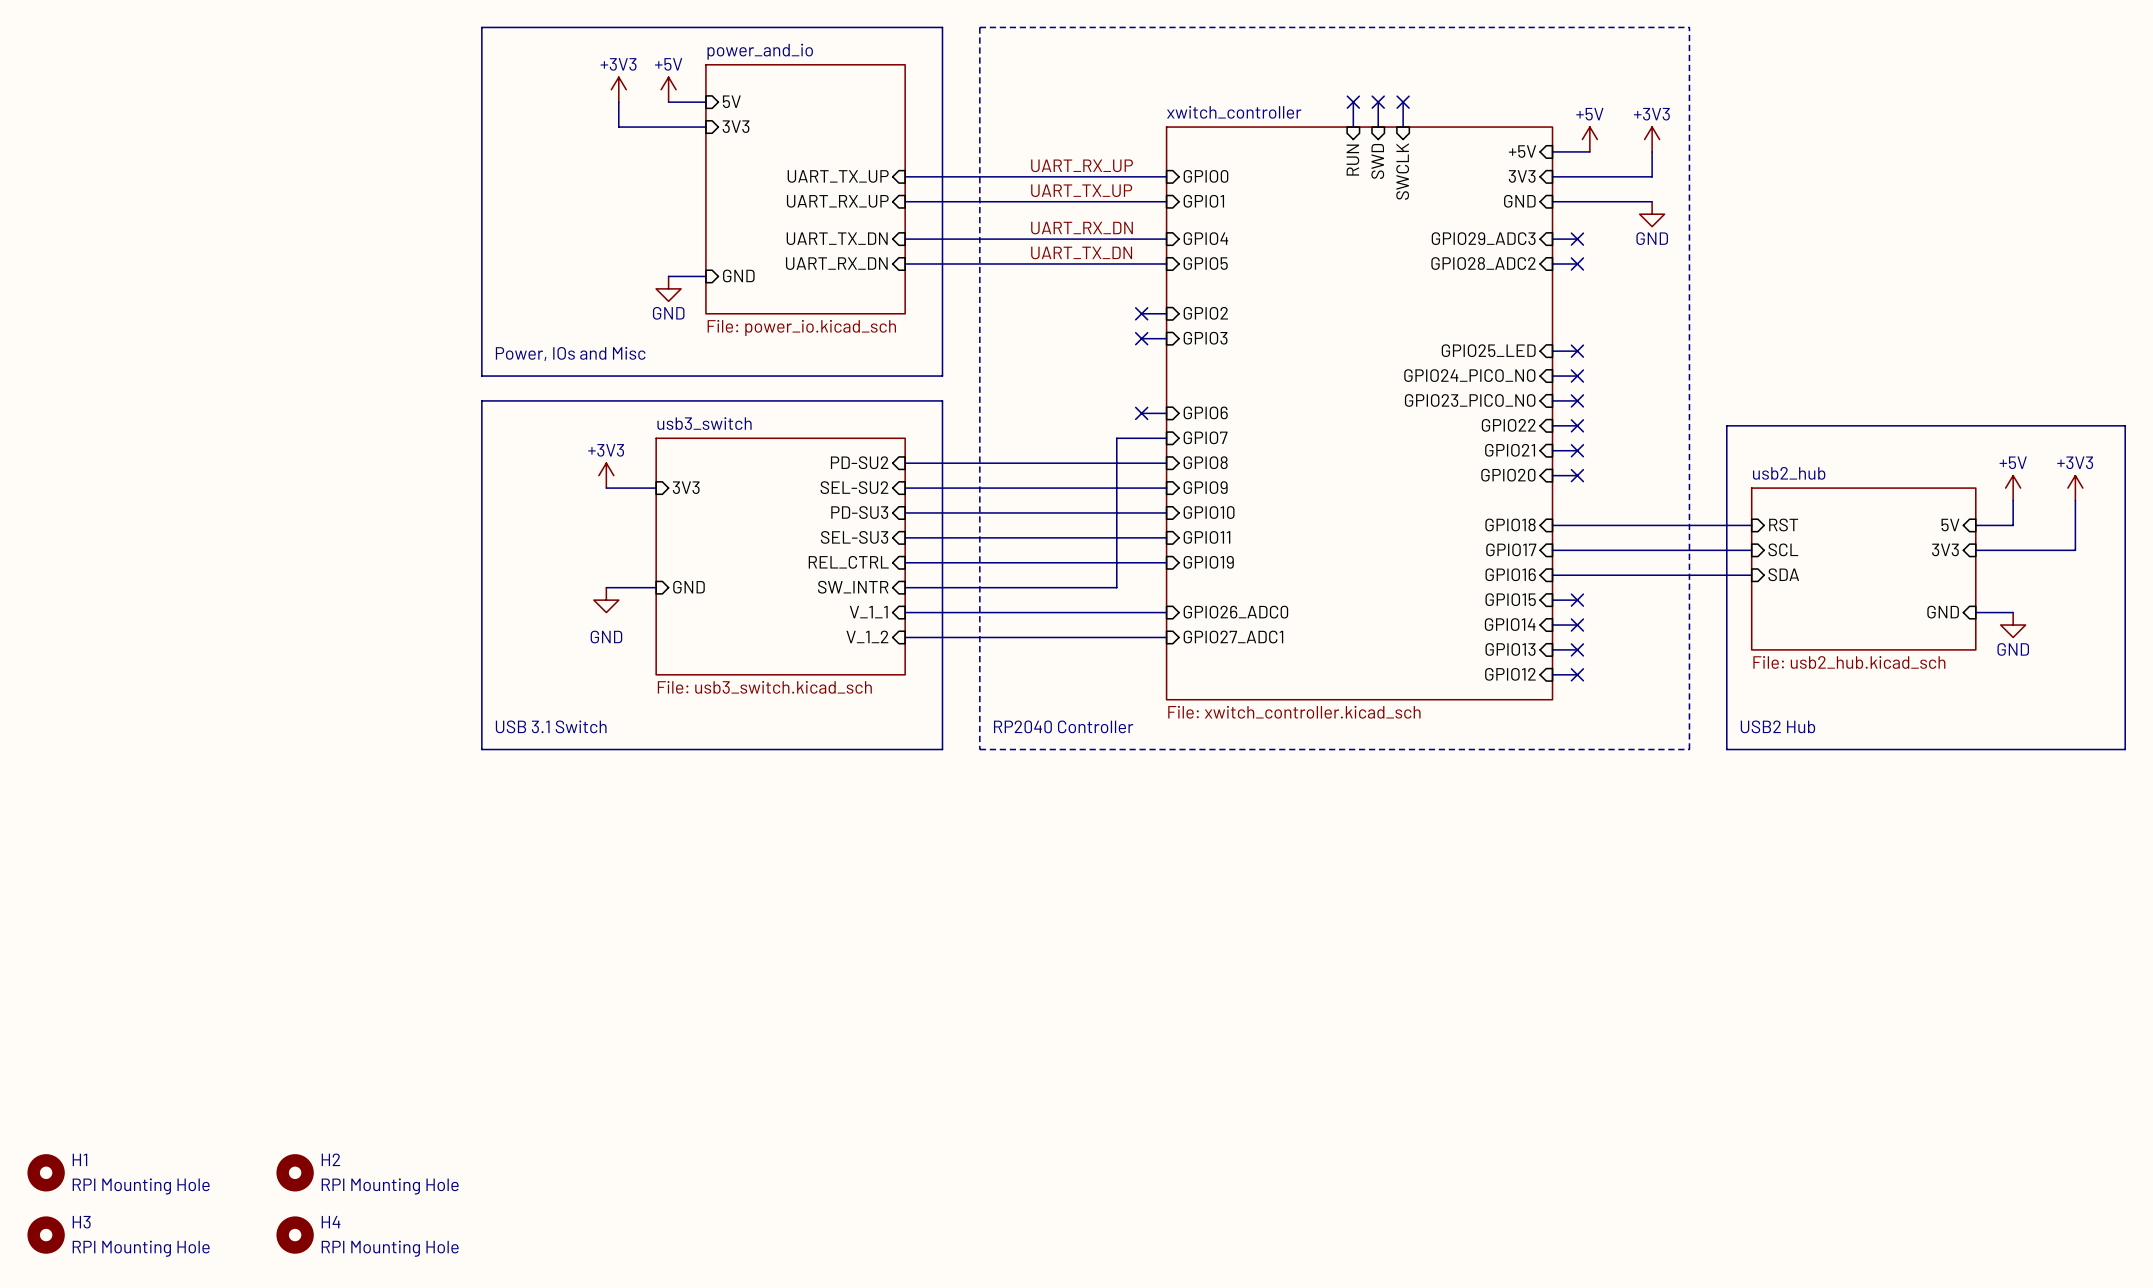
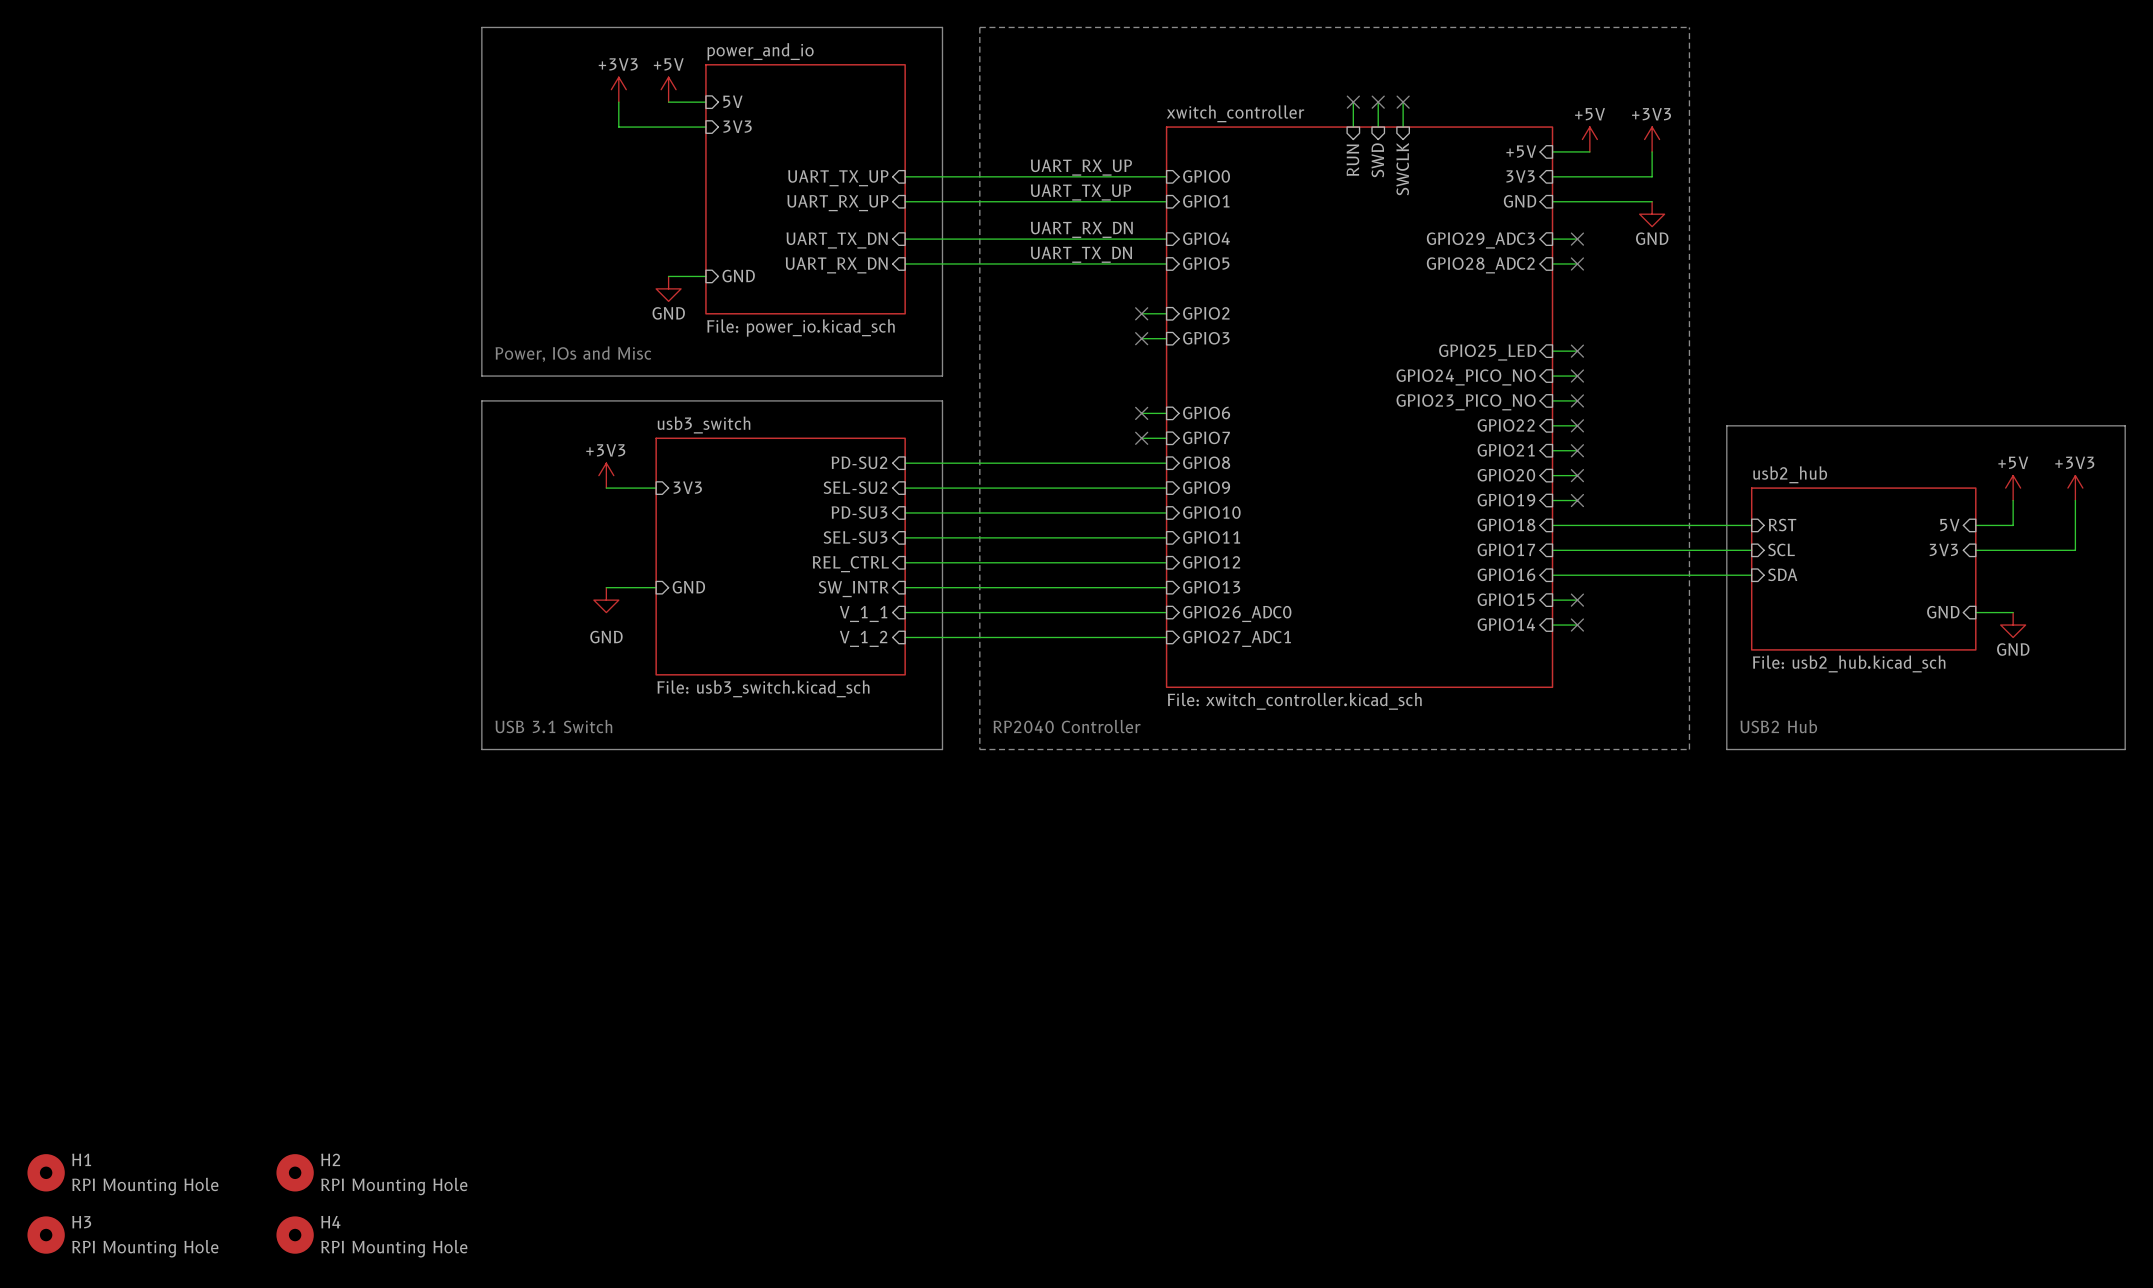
sheet xwitch_controller shape: [1165, 126, 1554, 701] -> [1165, 126, 1554, 689]
wire: (1141, 438) (1116, 438) (1116, 587) -> (1166, 587) (1116, 587)
no-connect mark: none -> (1141, 438)
sheet pin: none -> GPIO19 (1506, 500)
no-connect mark: none -> (1577, 500)
sheet pin: GPIO19 (1208, 562) -> GPIO12 (1211, 562)
sheet pin: none -> GPIO13 (1211, 587)
sheet pin: GPIO13 (1510, 649) -> none
wire: (1552, 649) (1577, 649) -> (1552, 500) (1577, 500)
no-connect mark: (1577, 649) -> none
sheet pin: GPIO12 (1510, 674) -> none
wire: (1552, 674) (1577, 674) -> none
no-connect mark: (1577, 674) -> none

